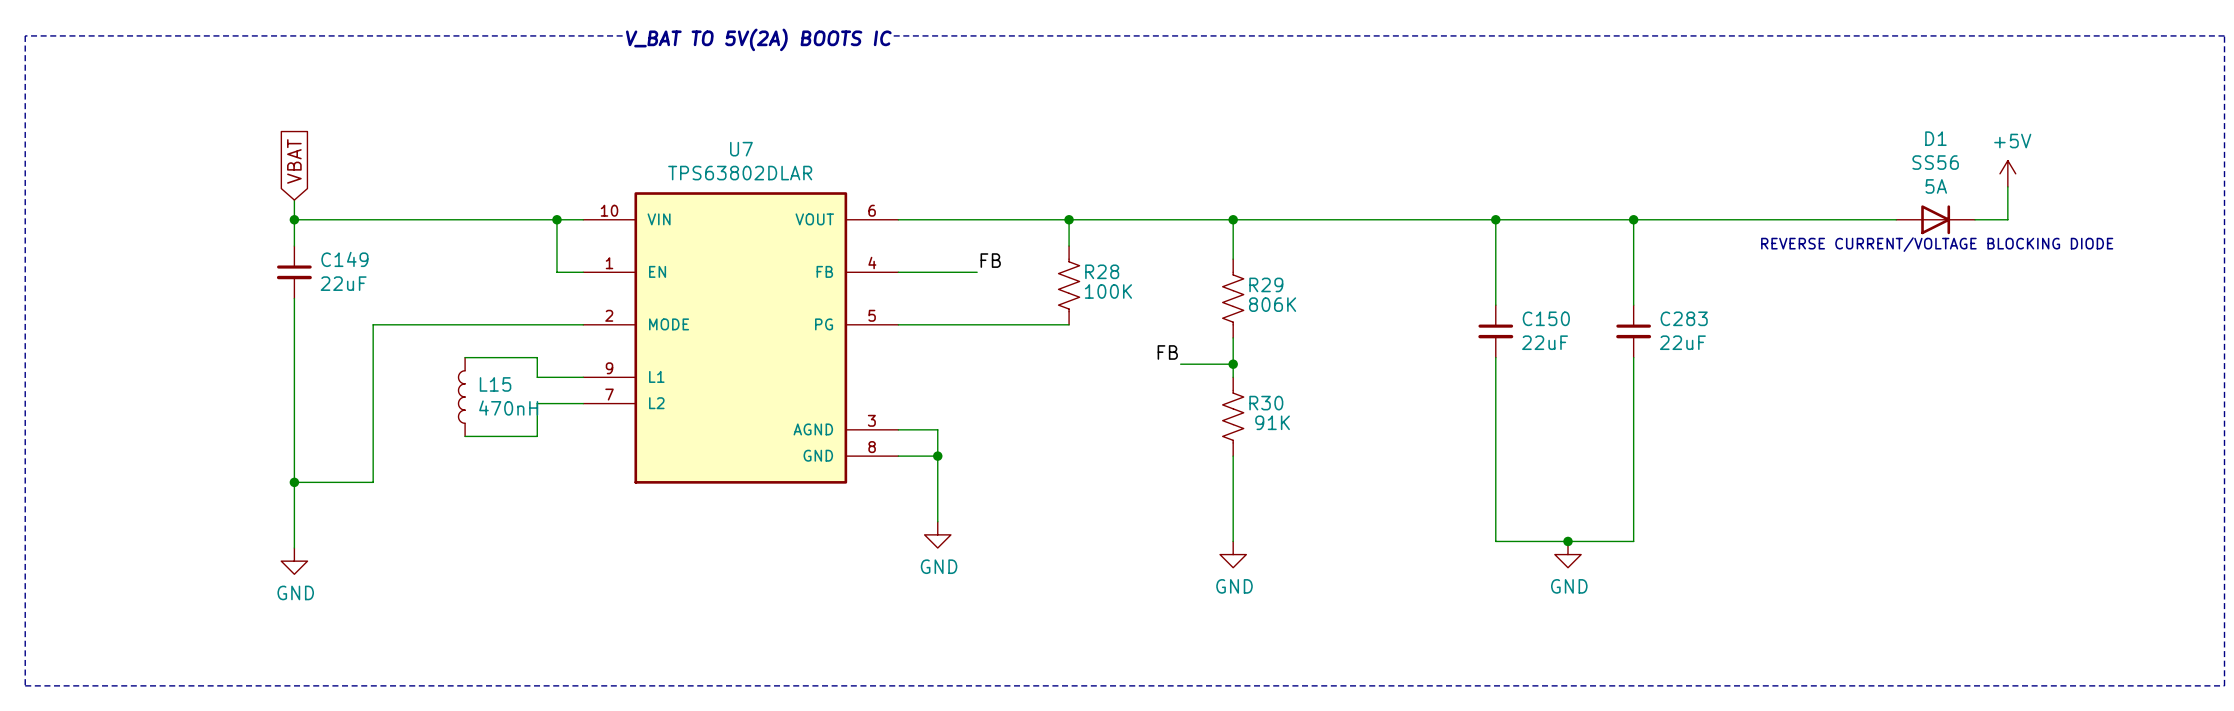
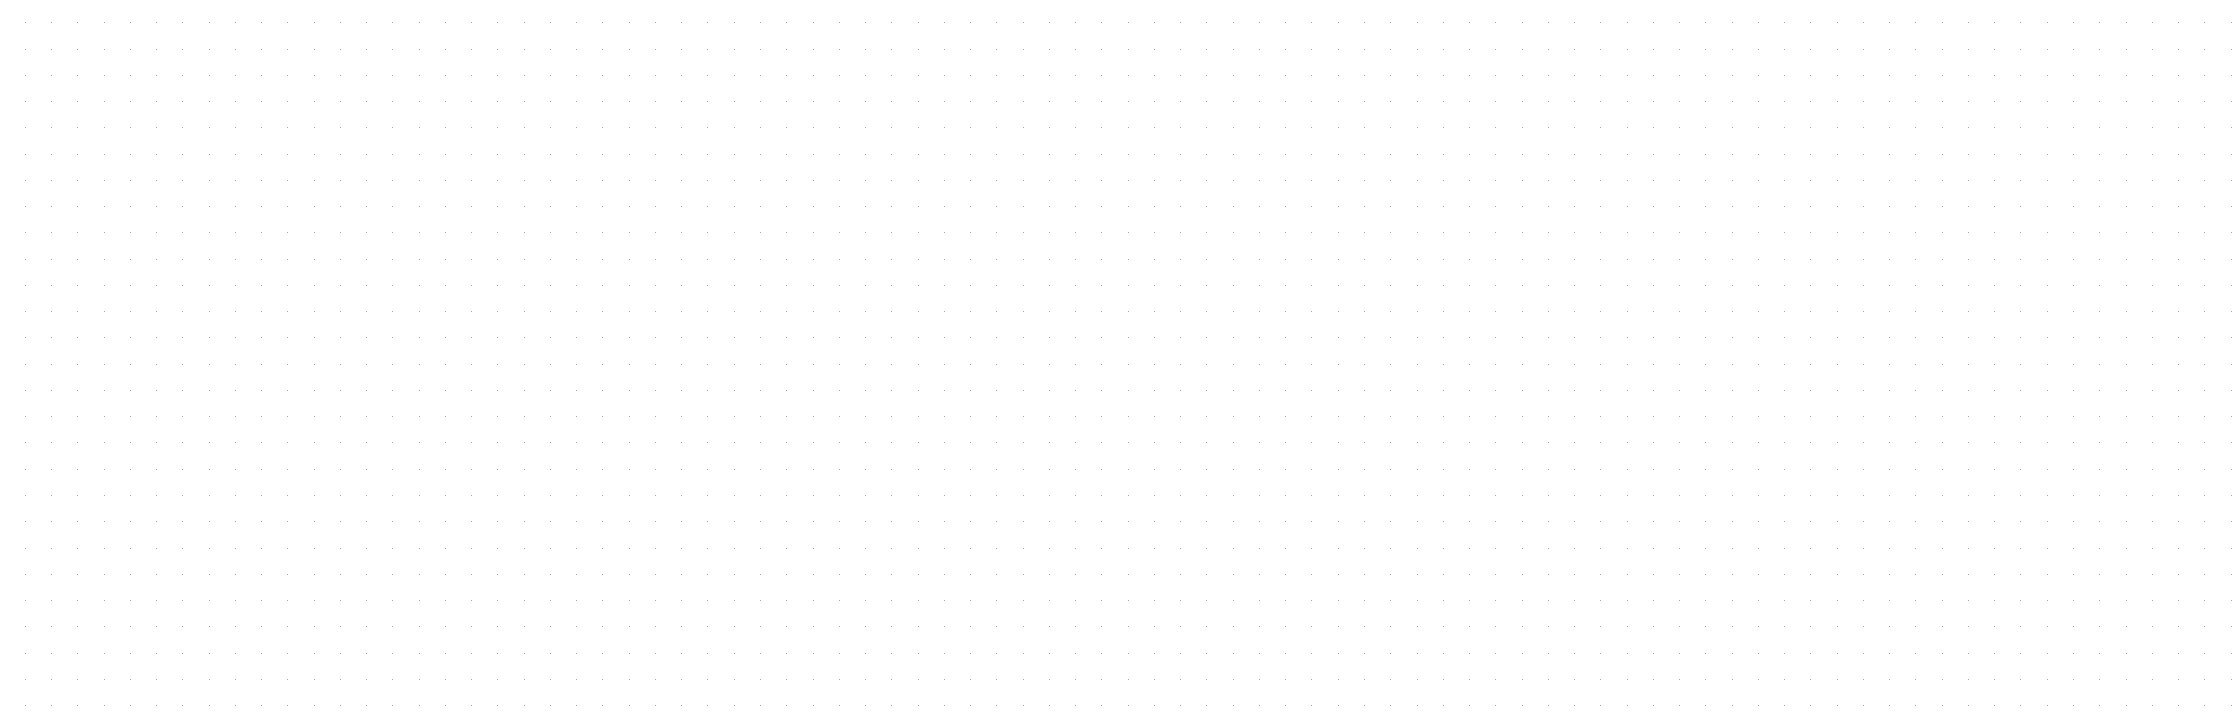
line: (622, 35) (25, 35) (25, 685) (2224, 685) (2224, 35) (891, 35) -> none
text: V_BAT TO 5V(2A) BOOTS IC (758, 39) -> none
global label: VBAT (294, 161) -> none
power symbol: +5V (2007, 173) -> none
wire: (2007, 186) (2007, 219) (1975, 219) -> none
wire: (294, 200) (294, 246) -> none
wire: (294, 219) (583, 219) -> none
junction: (294, 219) -> none
wire: (556, 219) (556, 272) (583, 272) -> none
junction: (556, 219) -> none
wire: (898, 219) (1896, 219) -> none
wire: (1069, 219) (1069, 246) -> none
junction: (1069, 219) -> none
wire: (1233, 219) (1233, 259) -> none
junction: (1233, 219) -> none
wire: (1495, 219) (1495, 305) -> none
junction: (1495, 219) -> none
wire: (1633, 219) (1633, 305) -> none
junction: (1633, 219) -> none
D1: SS56 (1935, 219) -> none
text: REVERSE CURRENT/VOLTAGE BLOCKING DIODE (1937, 244) -> none
label: FB (990, 260) -> none
C149: 22uF (294, 272) -> none
wire: (898, 272) (977, 272) -> none
R28: 100K (1069, 285) -> none
wire: (294, 298) (294, 548) -> none
R29: 806K (1233, 298) -> none
wire: (583, 324) (373, 324) (373, 482) (294, 482) -> none
wire: (898, 324) (1069, 324) -> none
C150: 22uF (1495, 331) -> none
C283: 22uF (1633, 331) -> none
U7: TPS63802DLAR (740, 337) -> none
wire: (1233, 337) (1233, 377) -> none
label: FB (1167, 352) -> none
wire: (465, 357) (537, 357) (537, 377) (583, 377) -> none
wire: (1495, 357) (1495, 541) (1633, 541) (1633, 357) -> none
wire: (1180, 364) (1233, 364) -> none
junction: (1233, 364) -> none
L15: 470nH (461, 397) -> none
wire: (583, 403) (537, 403) (537, 436) (465, 436) -> none
R30: 91K (1233, 416) -> none
wire: (898, 429) (937, 429) (937, 521) -> none
wire: (898, 456) (937, 456) -> none
junction: (937, 456) -> none
wire: (1233, 456) (1233, 541) -> none
junction: (294, 482) -> none
power symbol: GND (937, 534) -> none
junction: (1568, 541) -> none
power symbol: GND (1233, 554) -> none
power symbol: GND (1568, 554) -> none
power symbol: GND (294, 561) -> none

